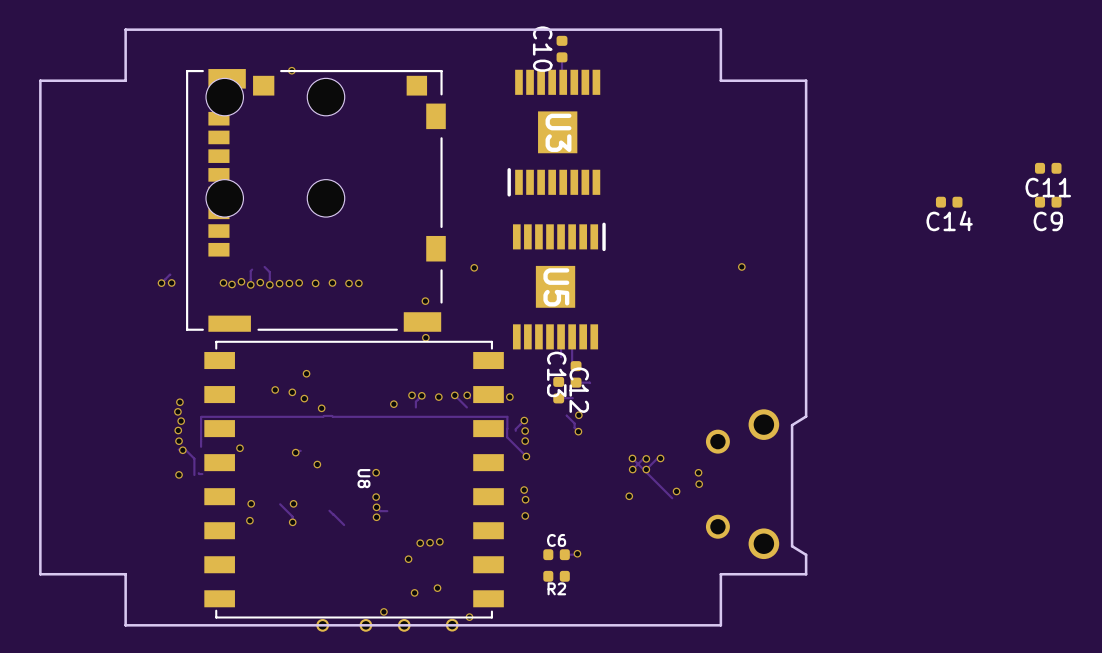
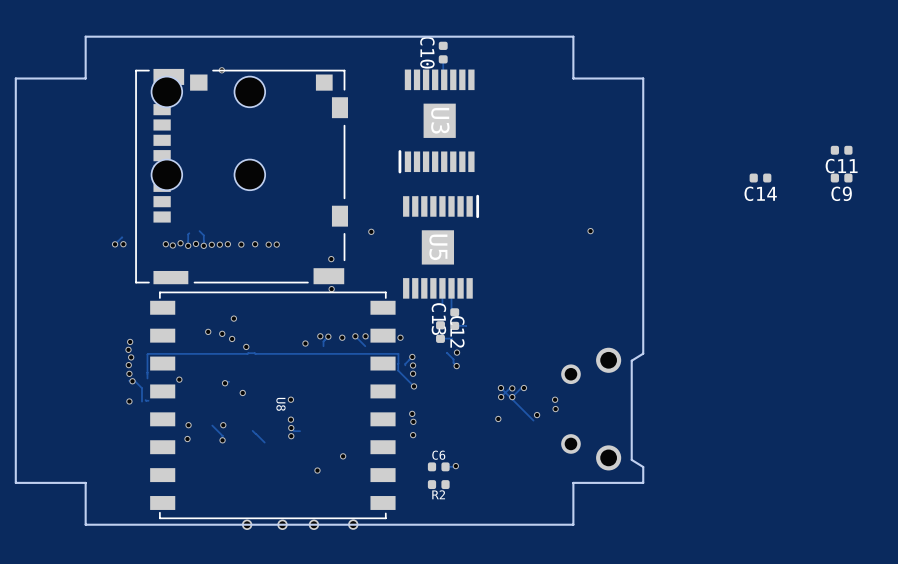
via: (430, 542) -> none
via: (420, 543) -> none
via: (437, 588) -> none
via: (414, 592) -> none
via: (383, 611) -> none
via: (469, 617) -> none

